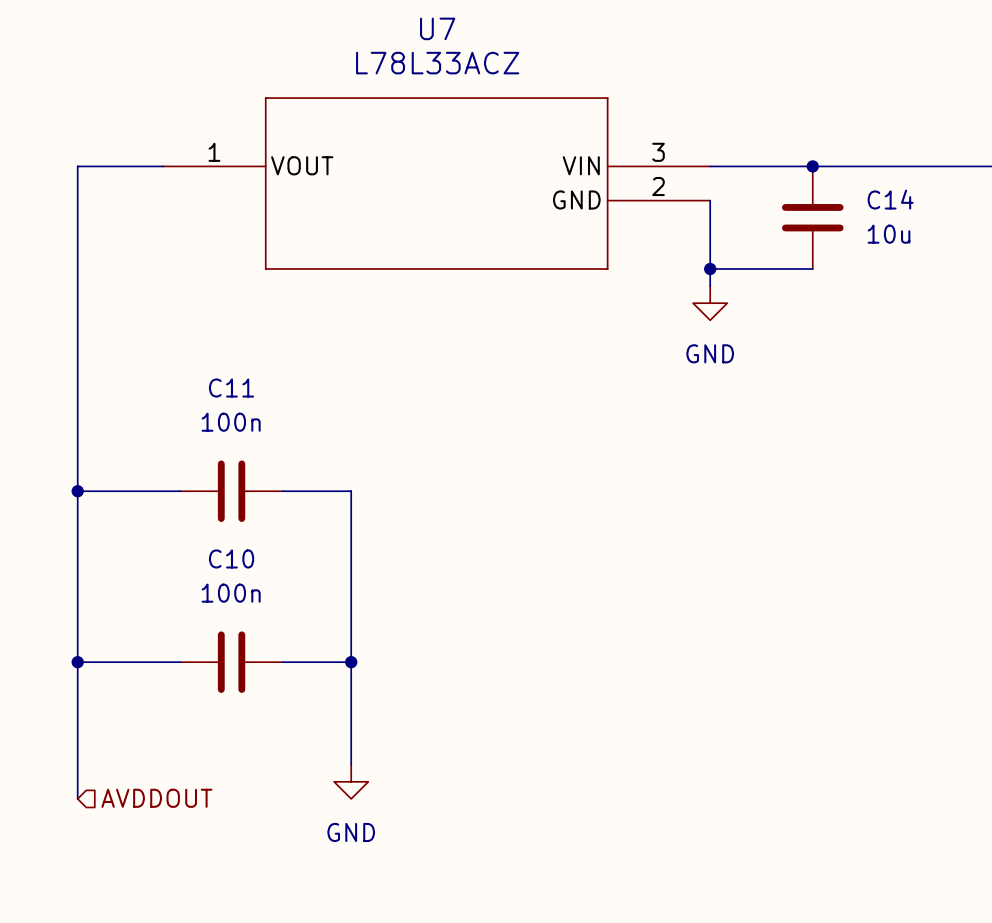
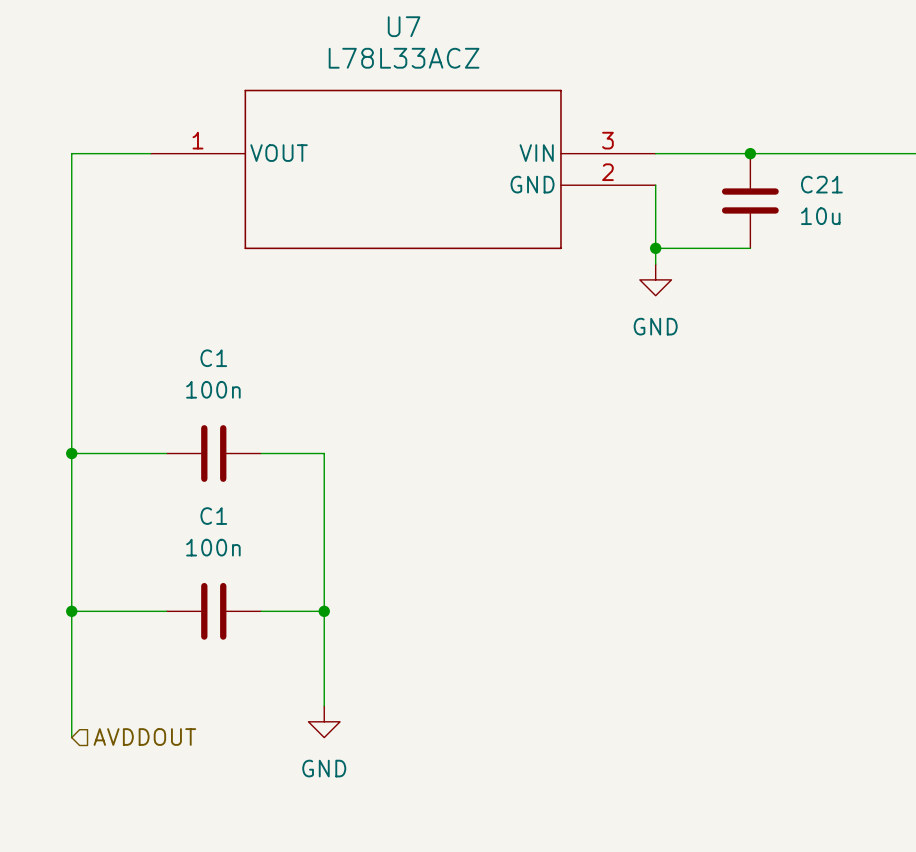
C14 name: C14 (890, 199) -> C21 (821, 184)
C11 name: C11 (231, 388) -> C1 (213, 358)
C10 name: C10 (231, 558) -> C1 (213, 516)

